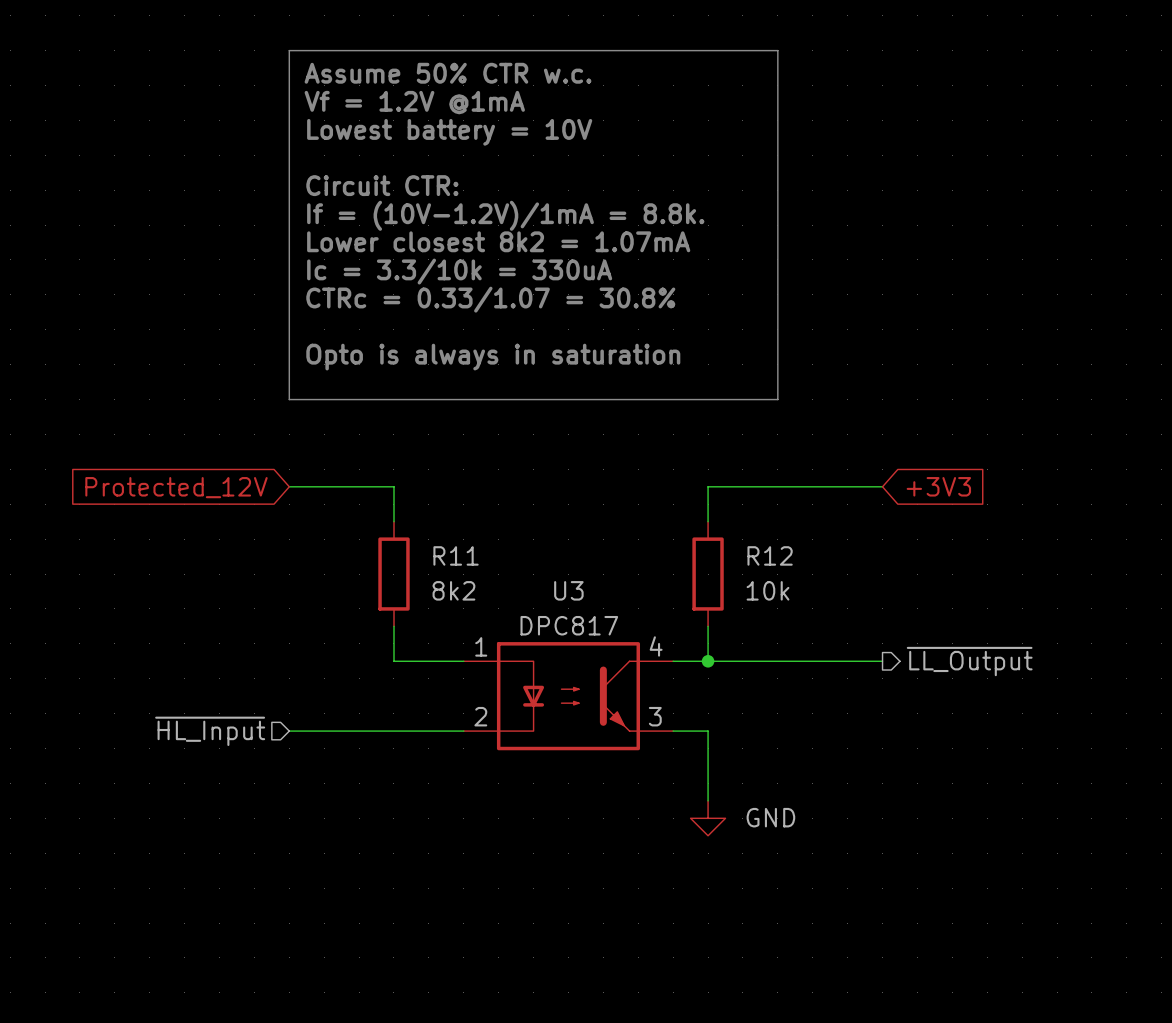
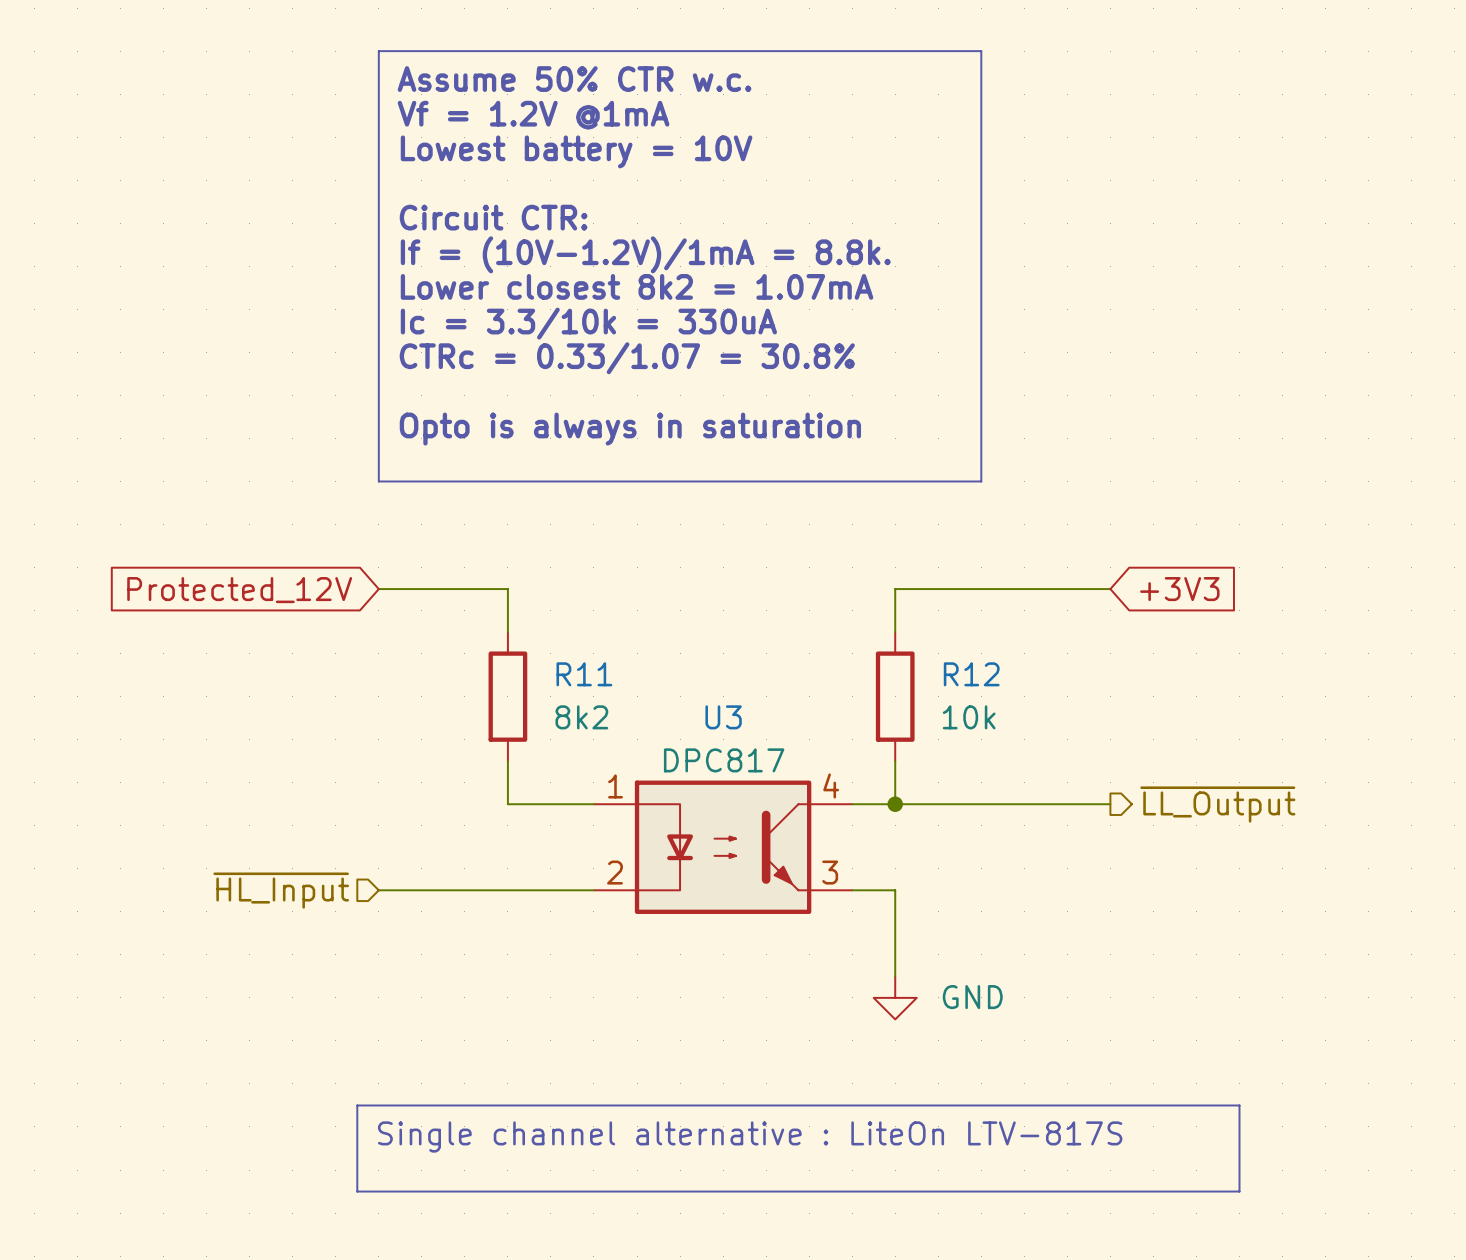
line: none -> (357, 1105) (1239, 1105) (1239, 1191) (357, 1191) (357, 1105)
text: none -> Single channel alternative : LiteOn LTV-817S (750, 1136)

